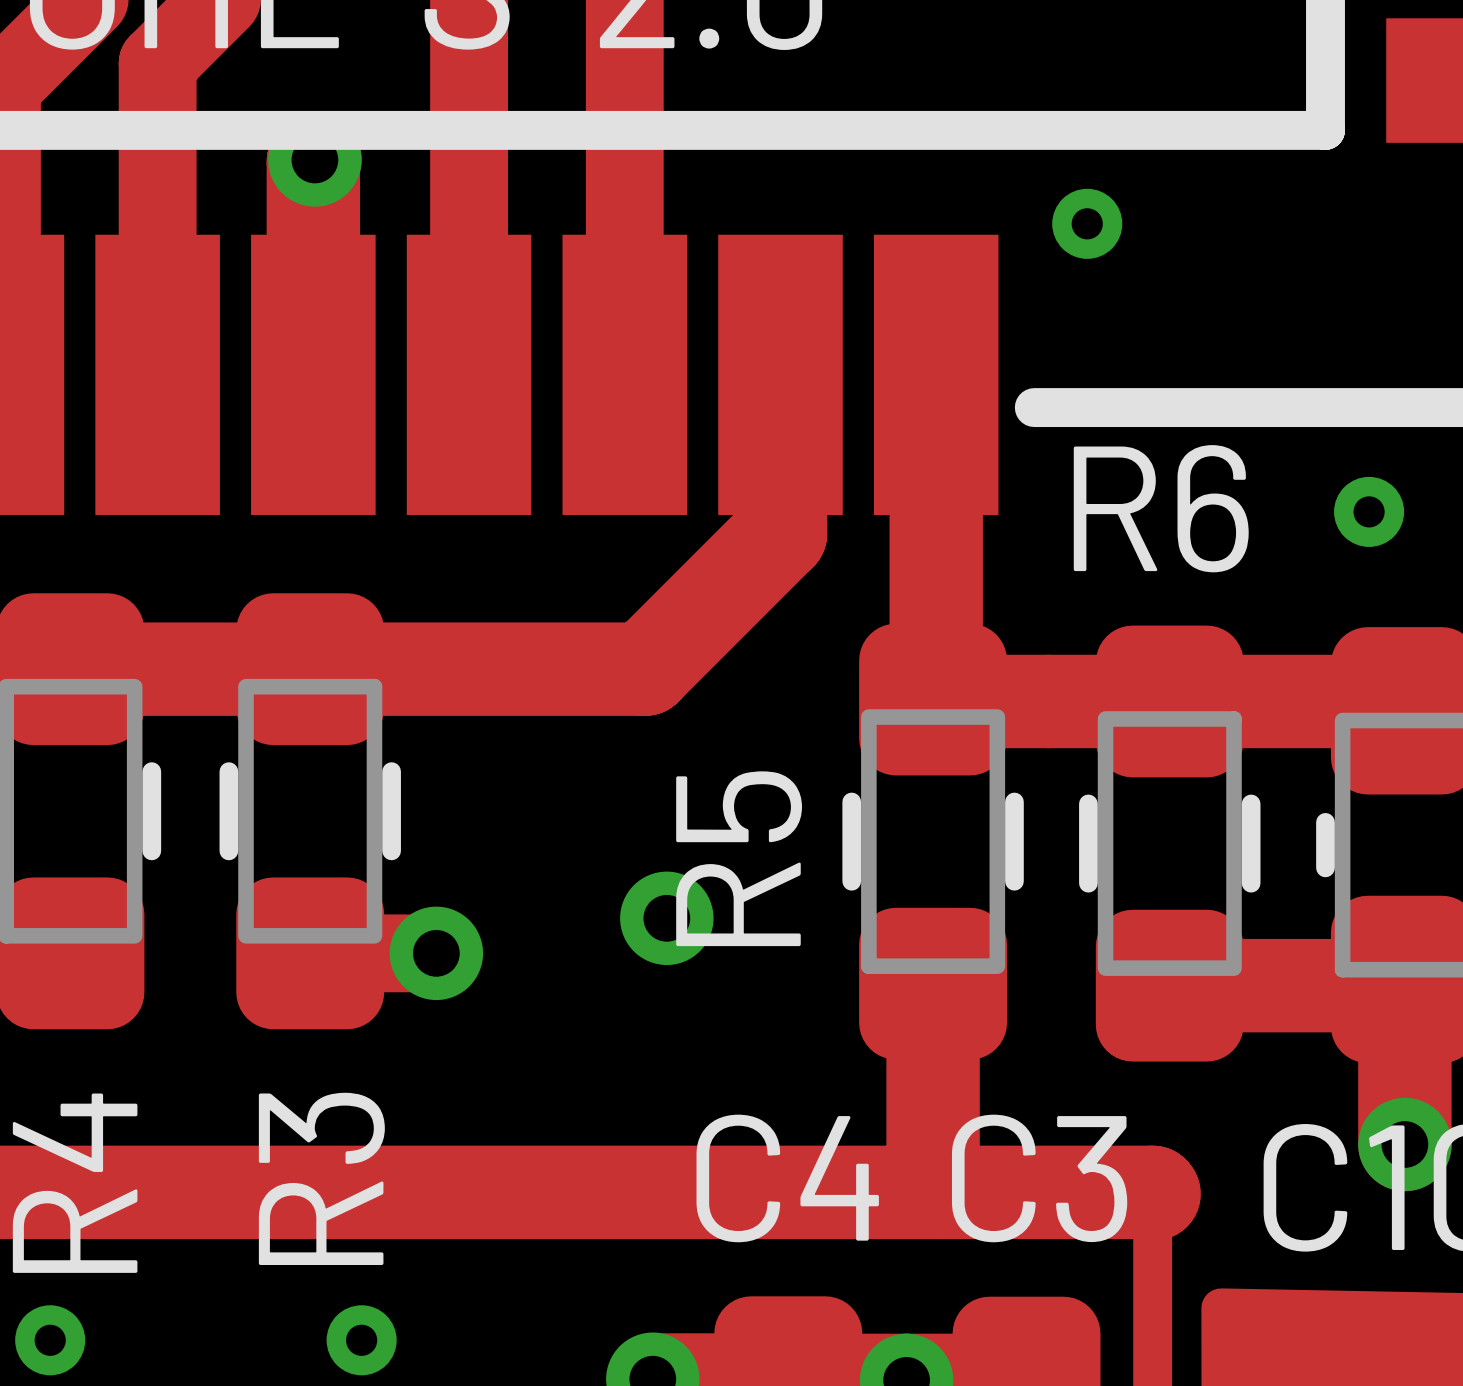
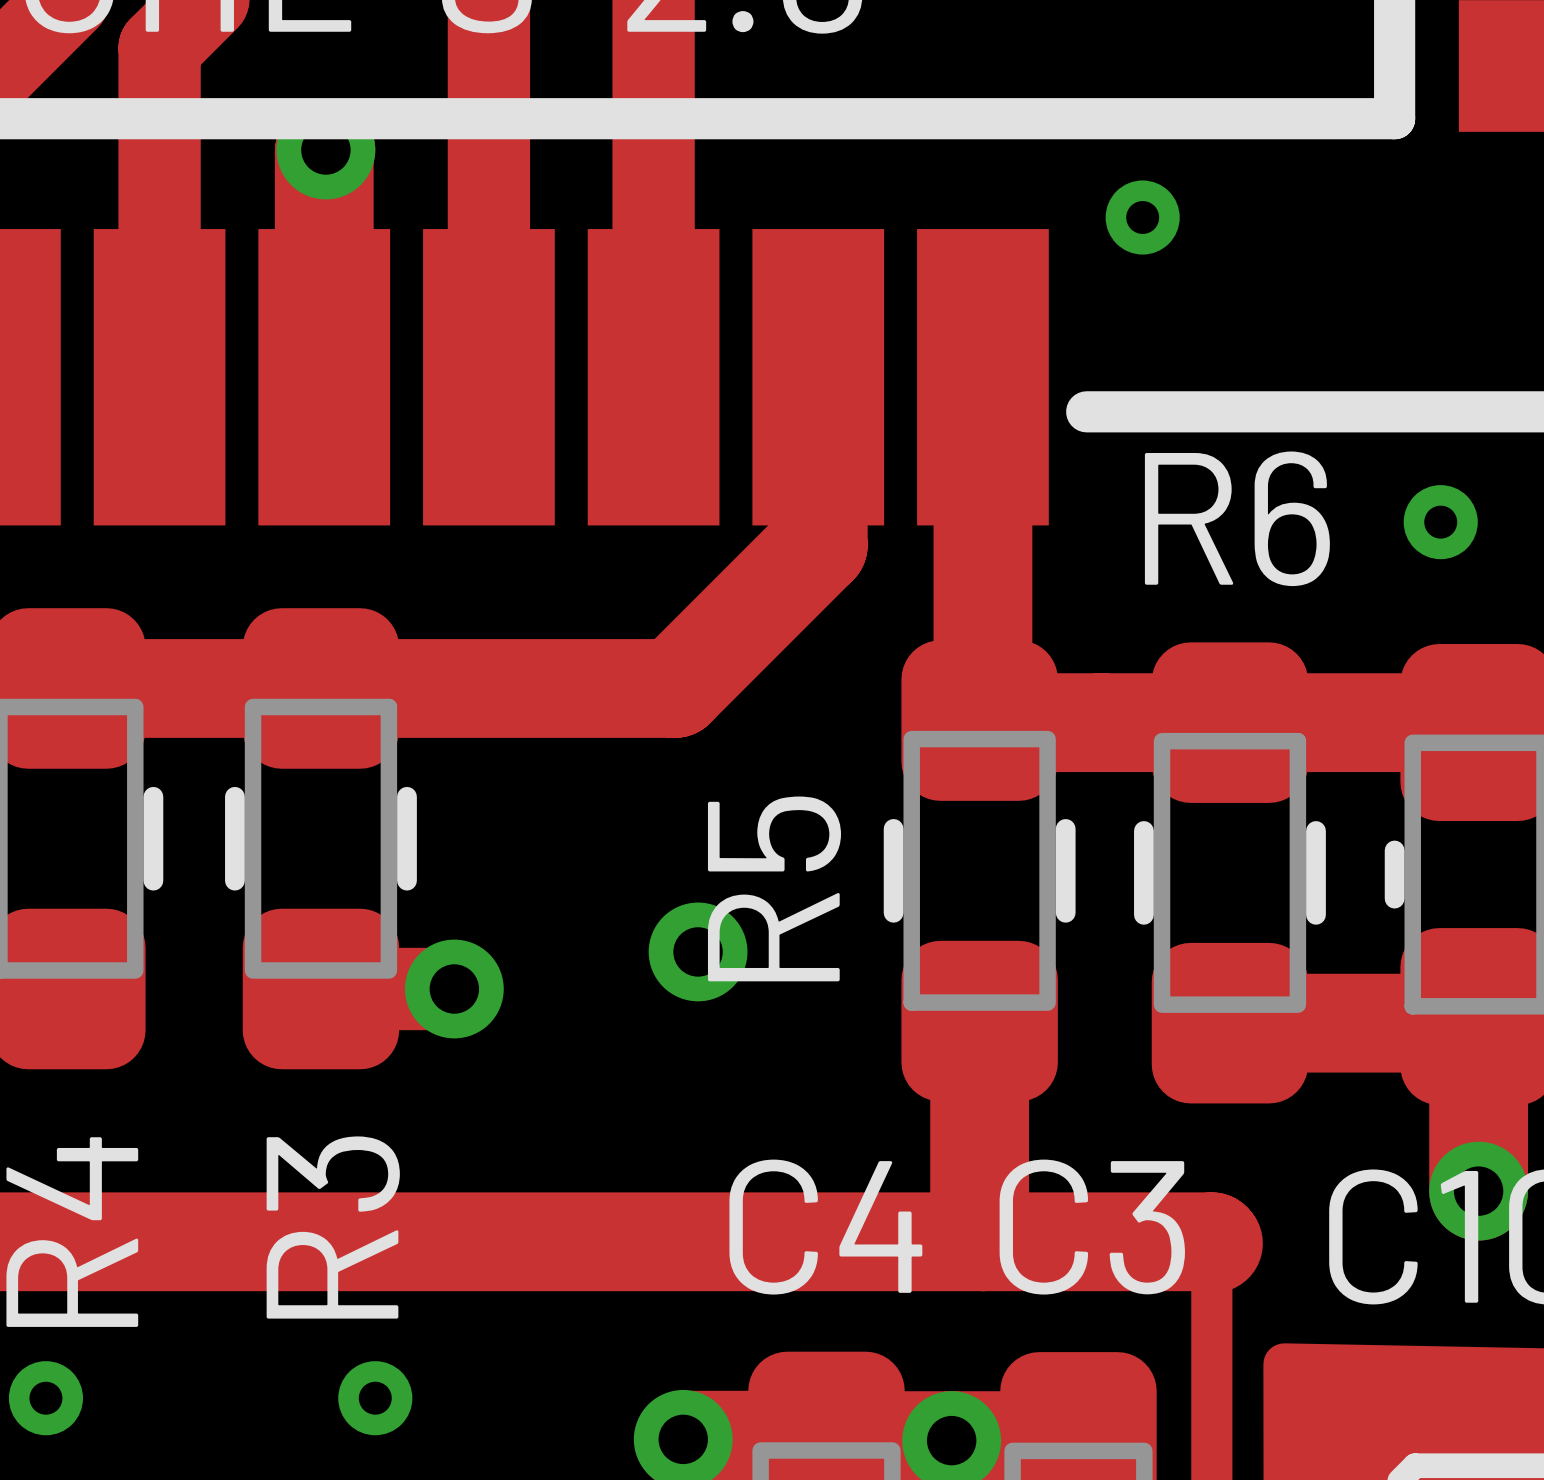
R6 name position: R6 (1161, 508) -> R6 (1237, 518)

